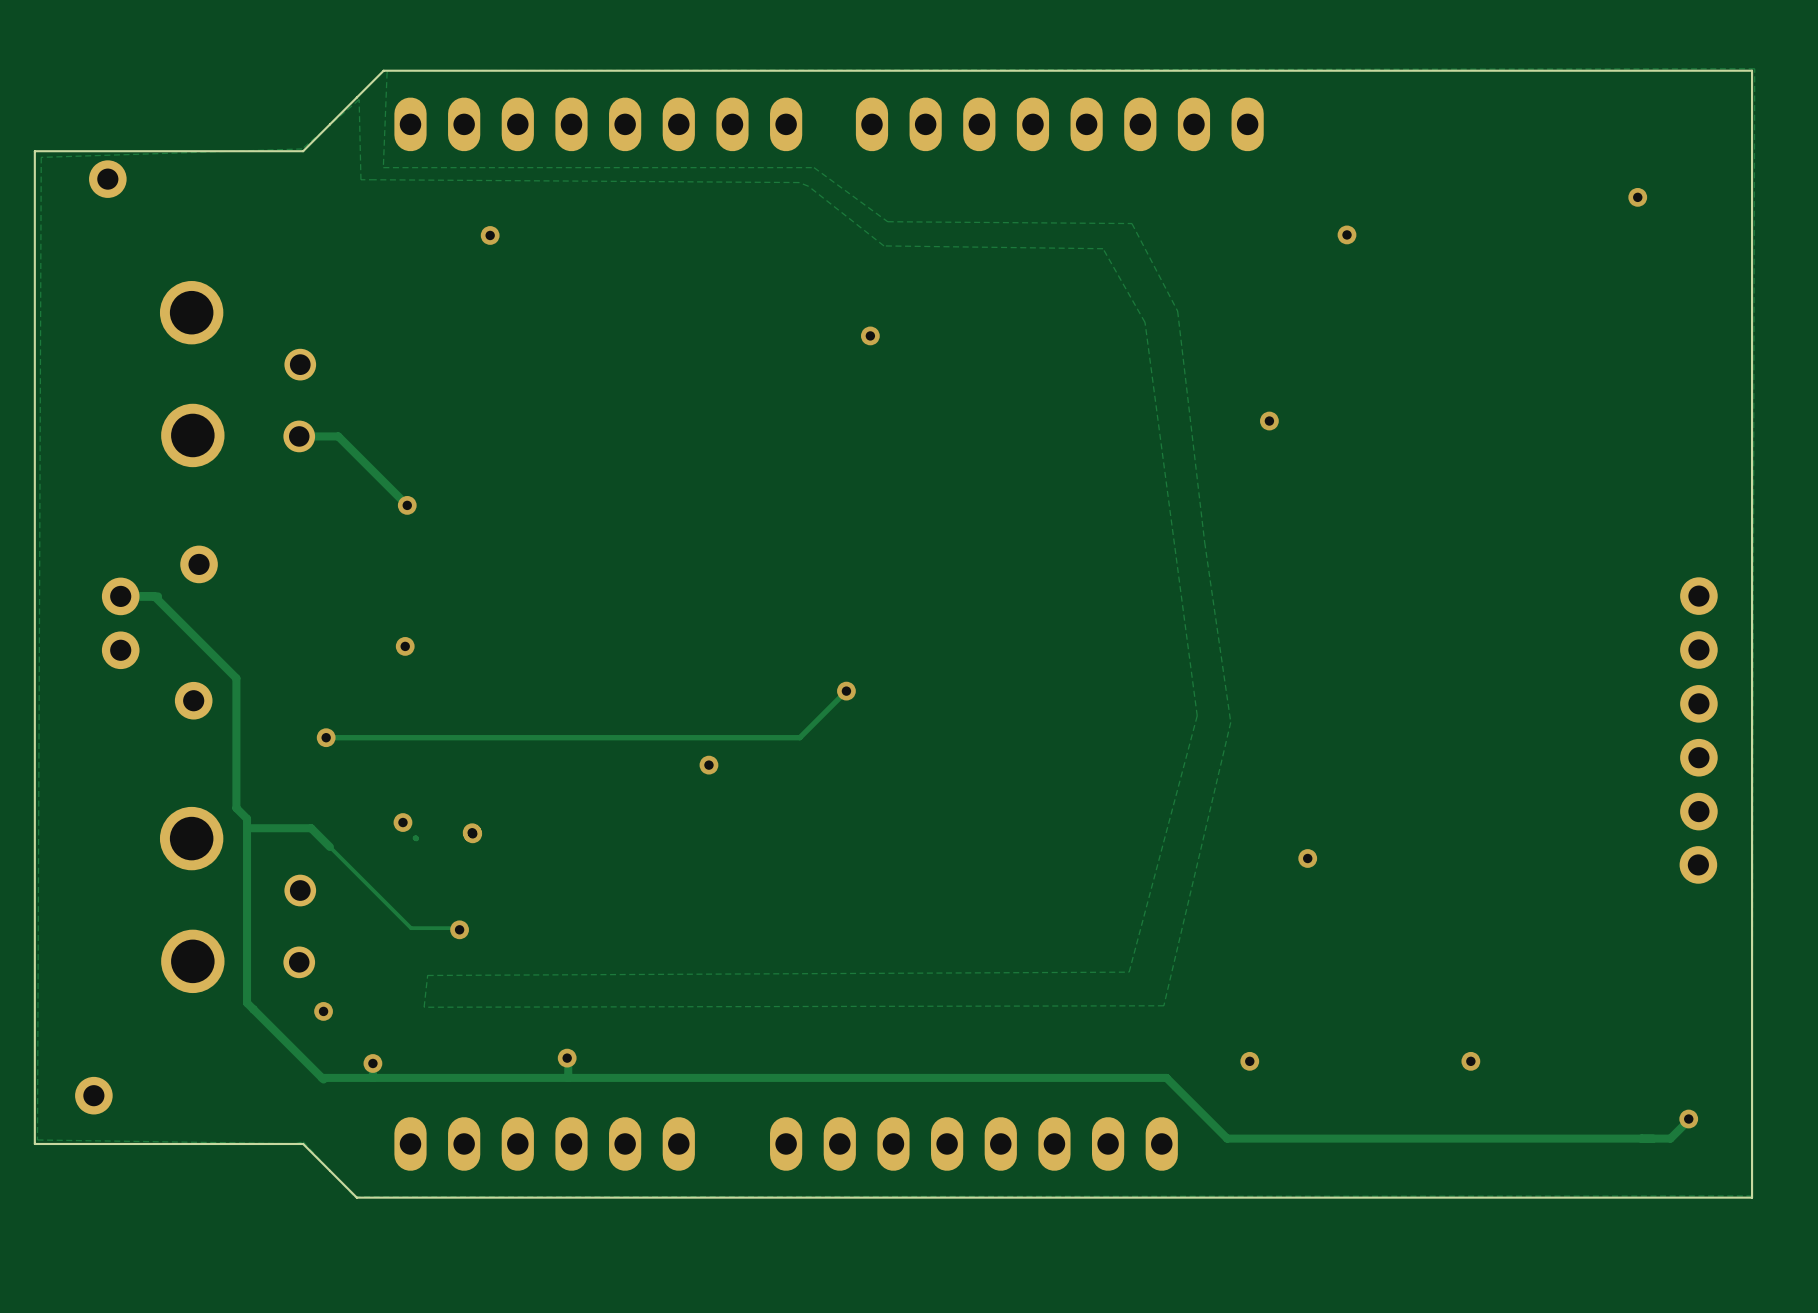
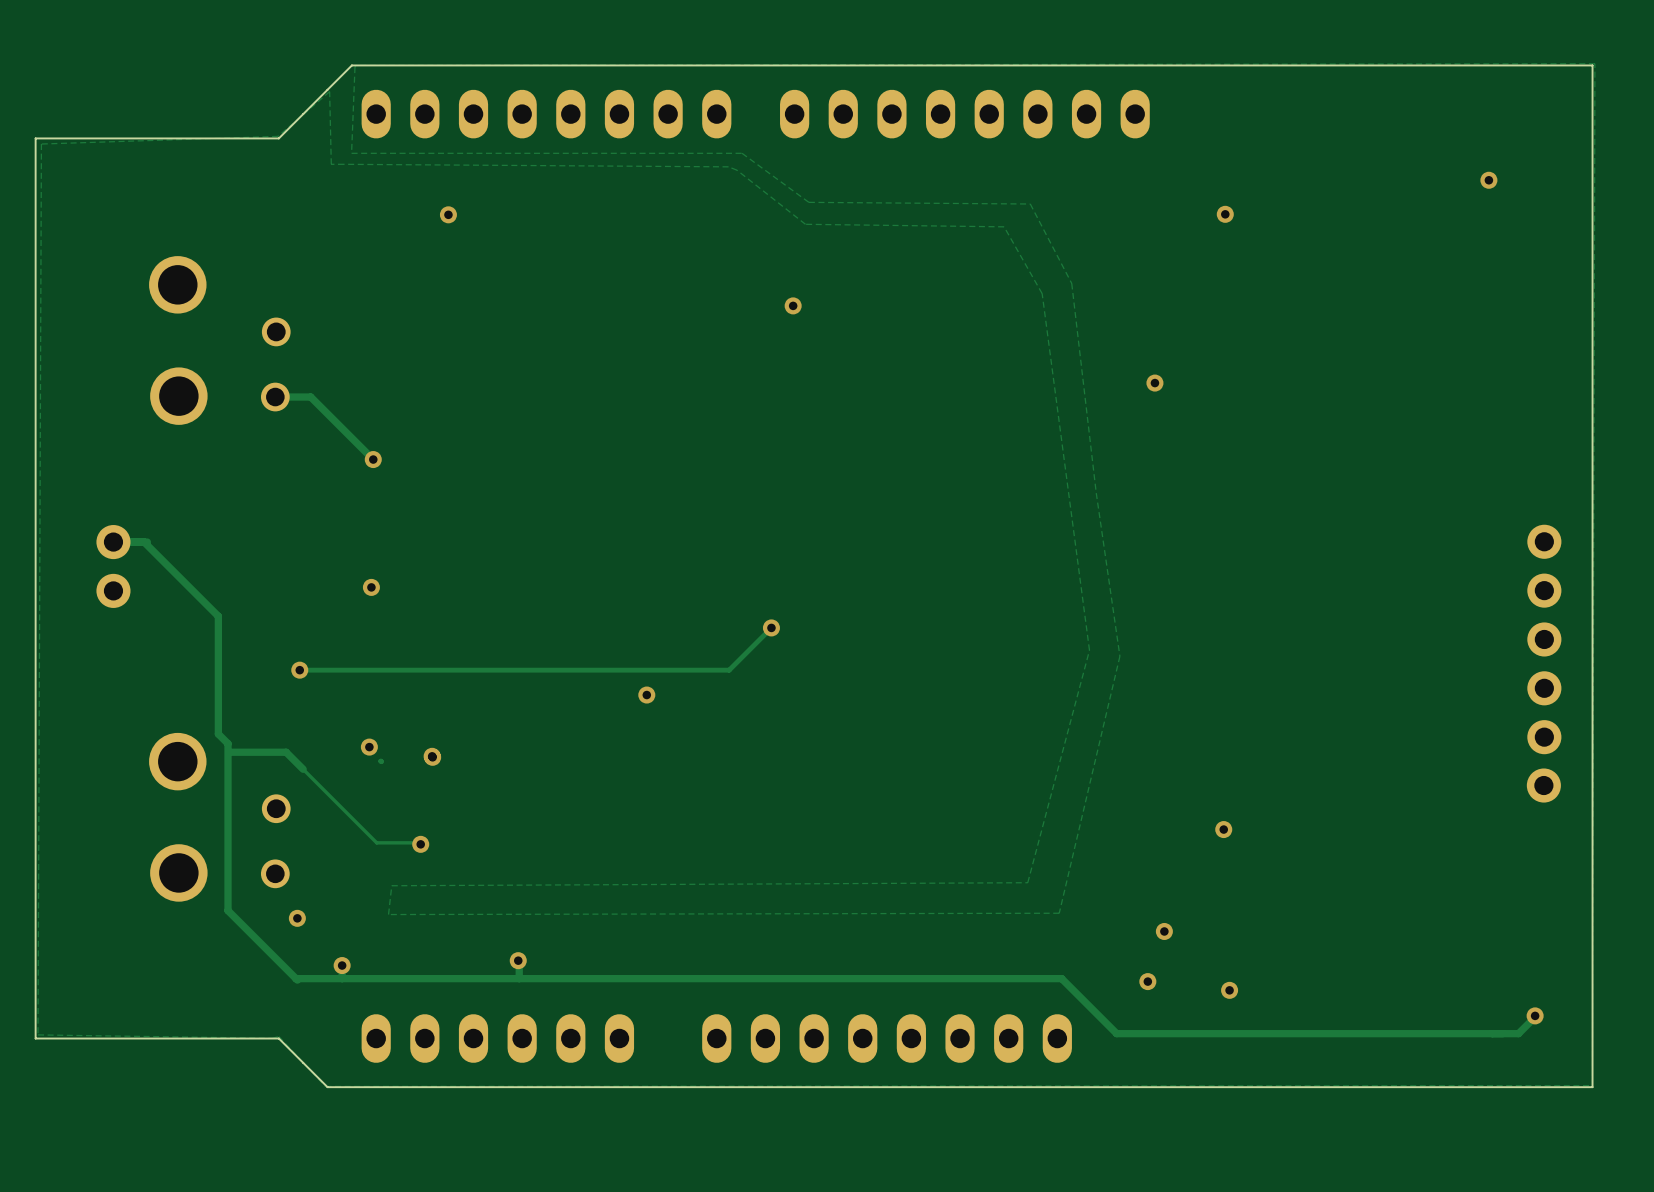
part: (107, 179) -> none
part: (199, 564) -> none
part: (193, 700) -> none
via position: (1307, 858) -> (1223, 829)
via: none -> (1164, 931)
via: (1249, 1061) -> none
via: (1470, 1061) -> none
via: none -> (1147, 981)
via: none -> (1229, 990)
part: (93, 1095) -> none

